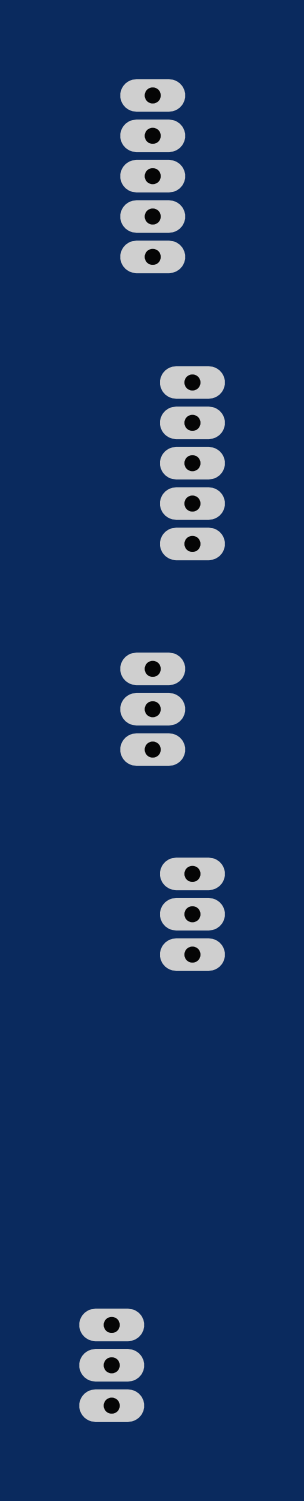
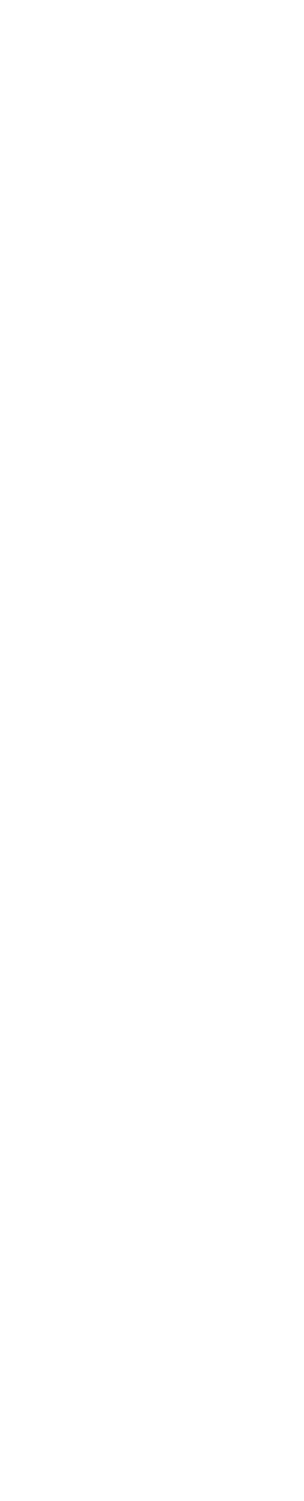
part: (152, 176) -> none
part: (192, 463) -> none
part: (152, 709) -> none
part: (192, 914) -> none
part: (111, 1365) -> none

